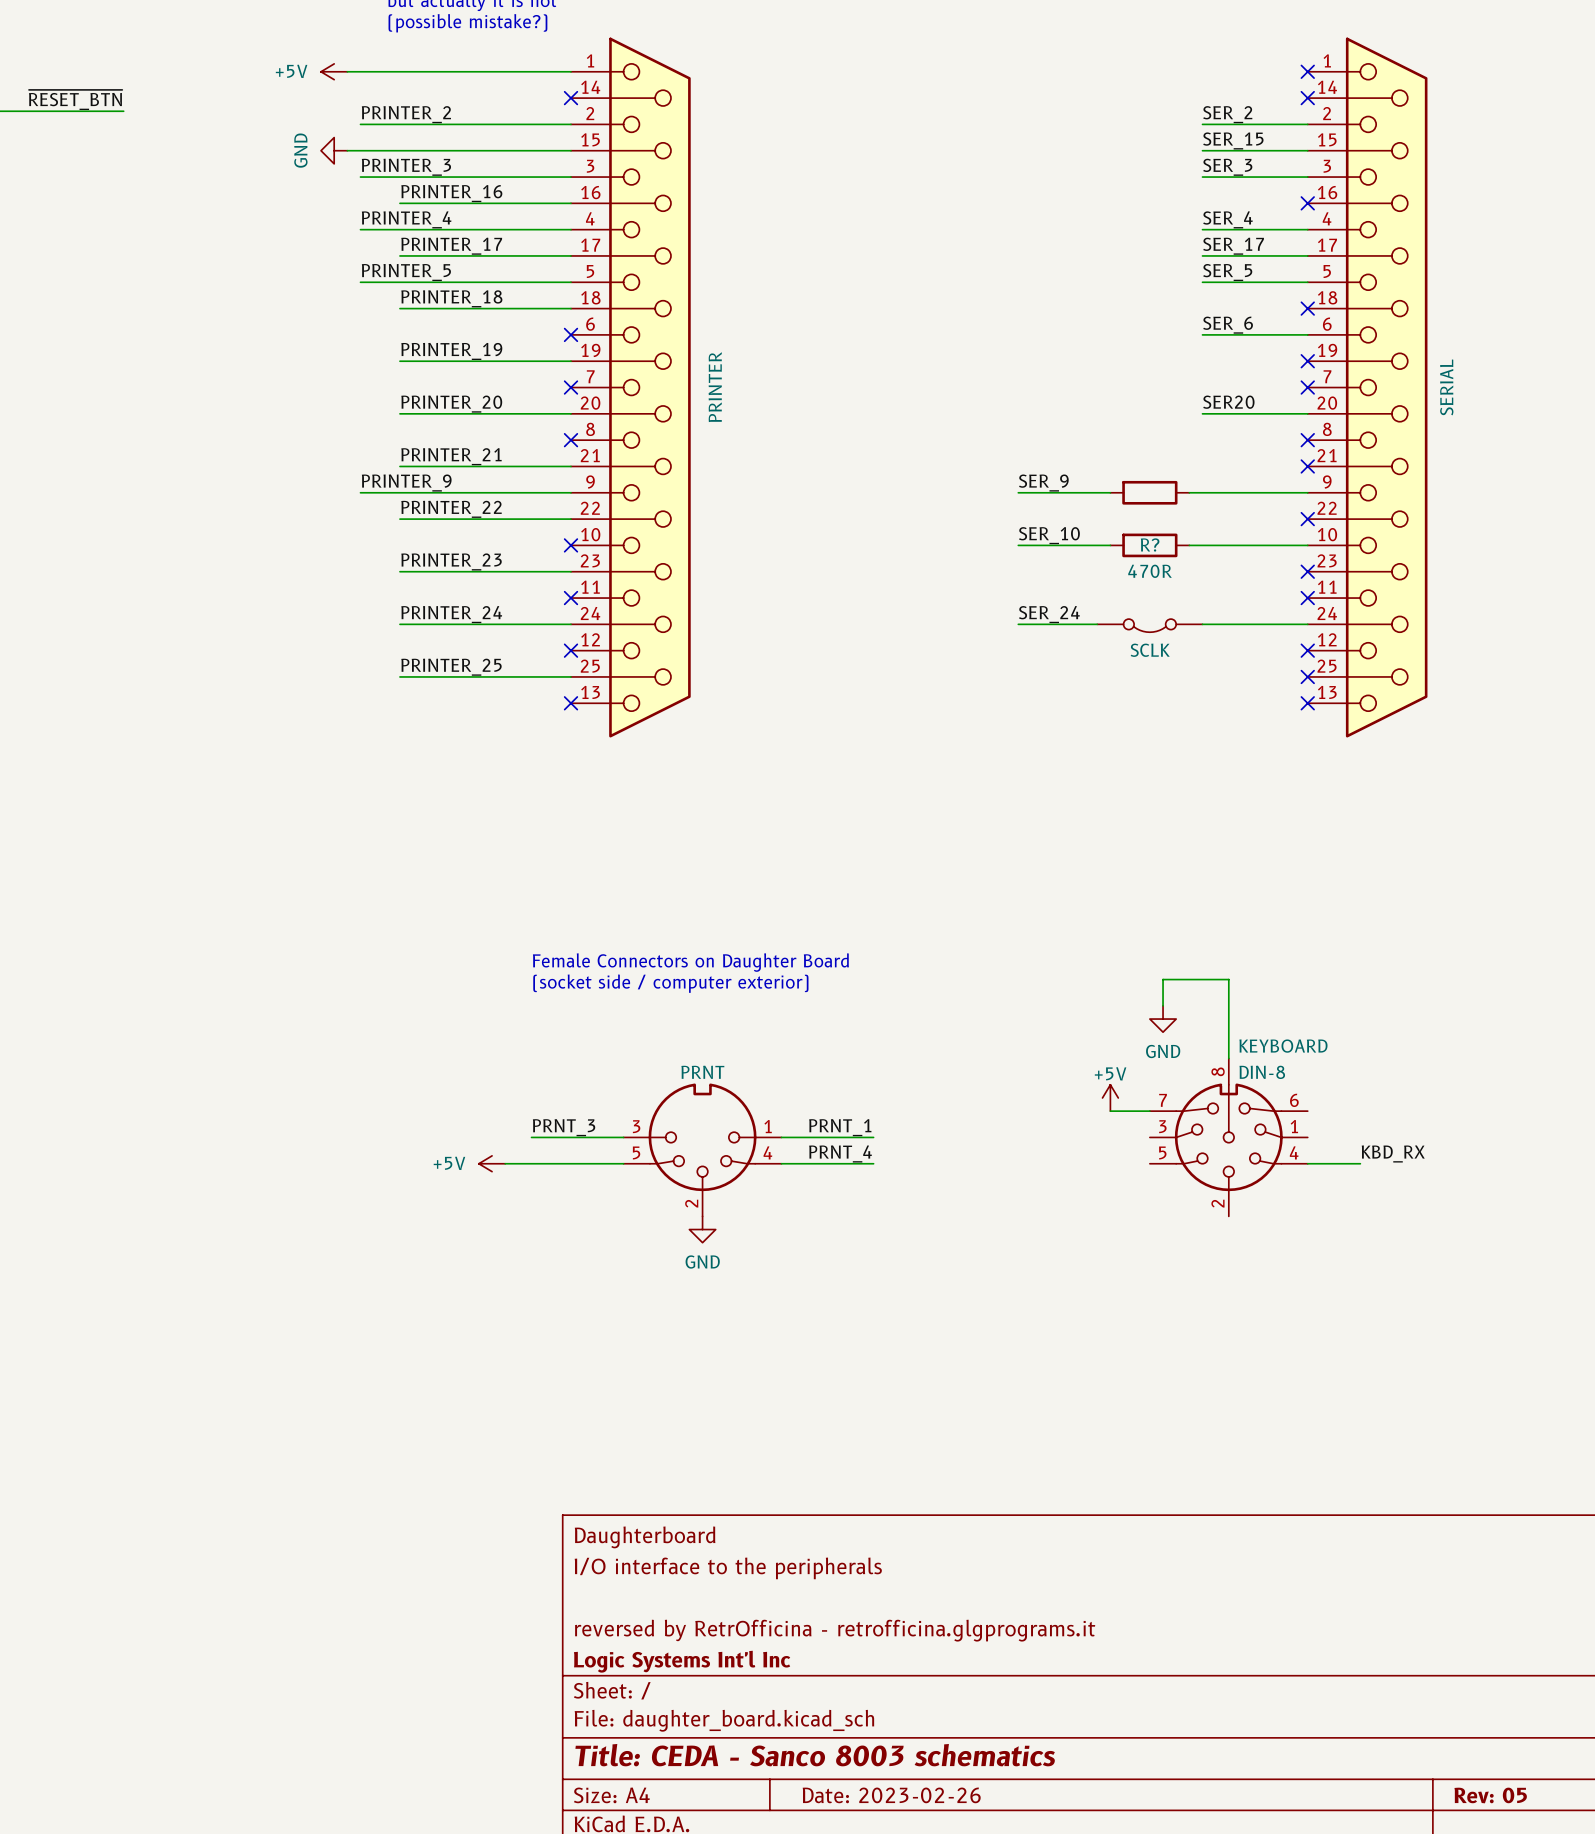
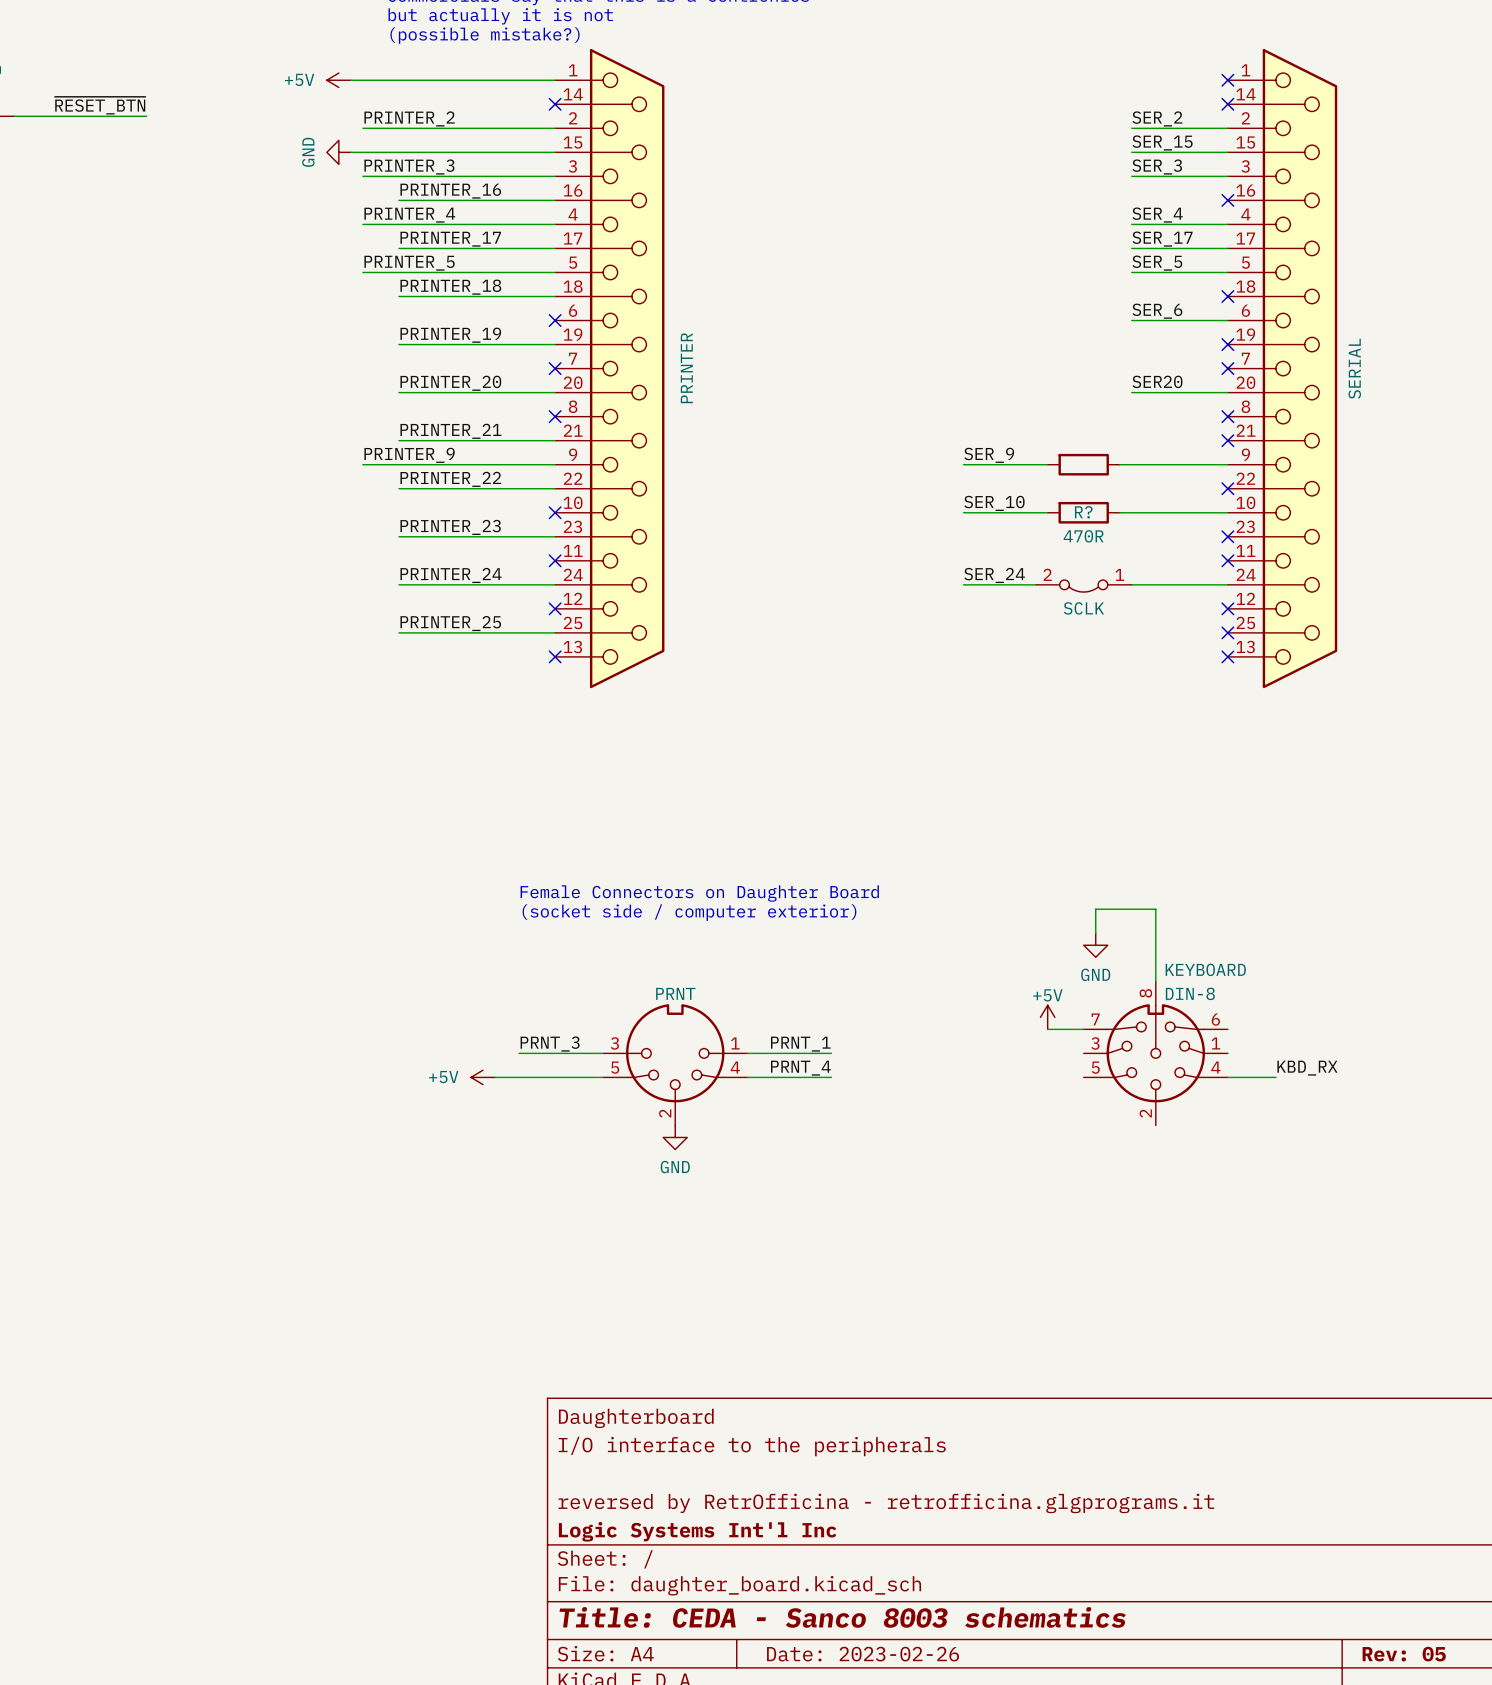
SCLK pin number: none -> 2 (1047, 574)
SCLK pin number: none -> 1 (1119, 574)

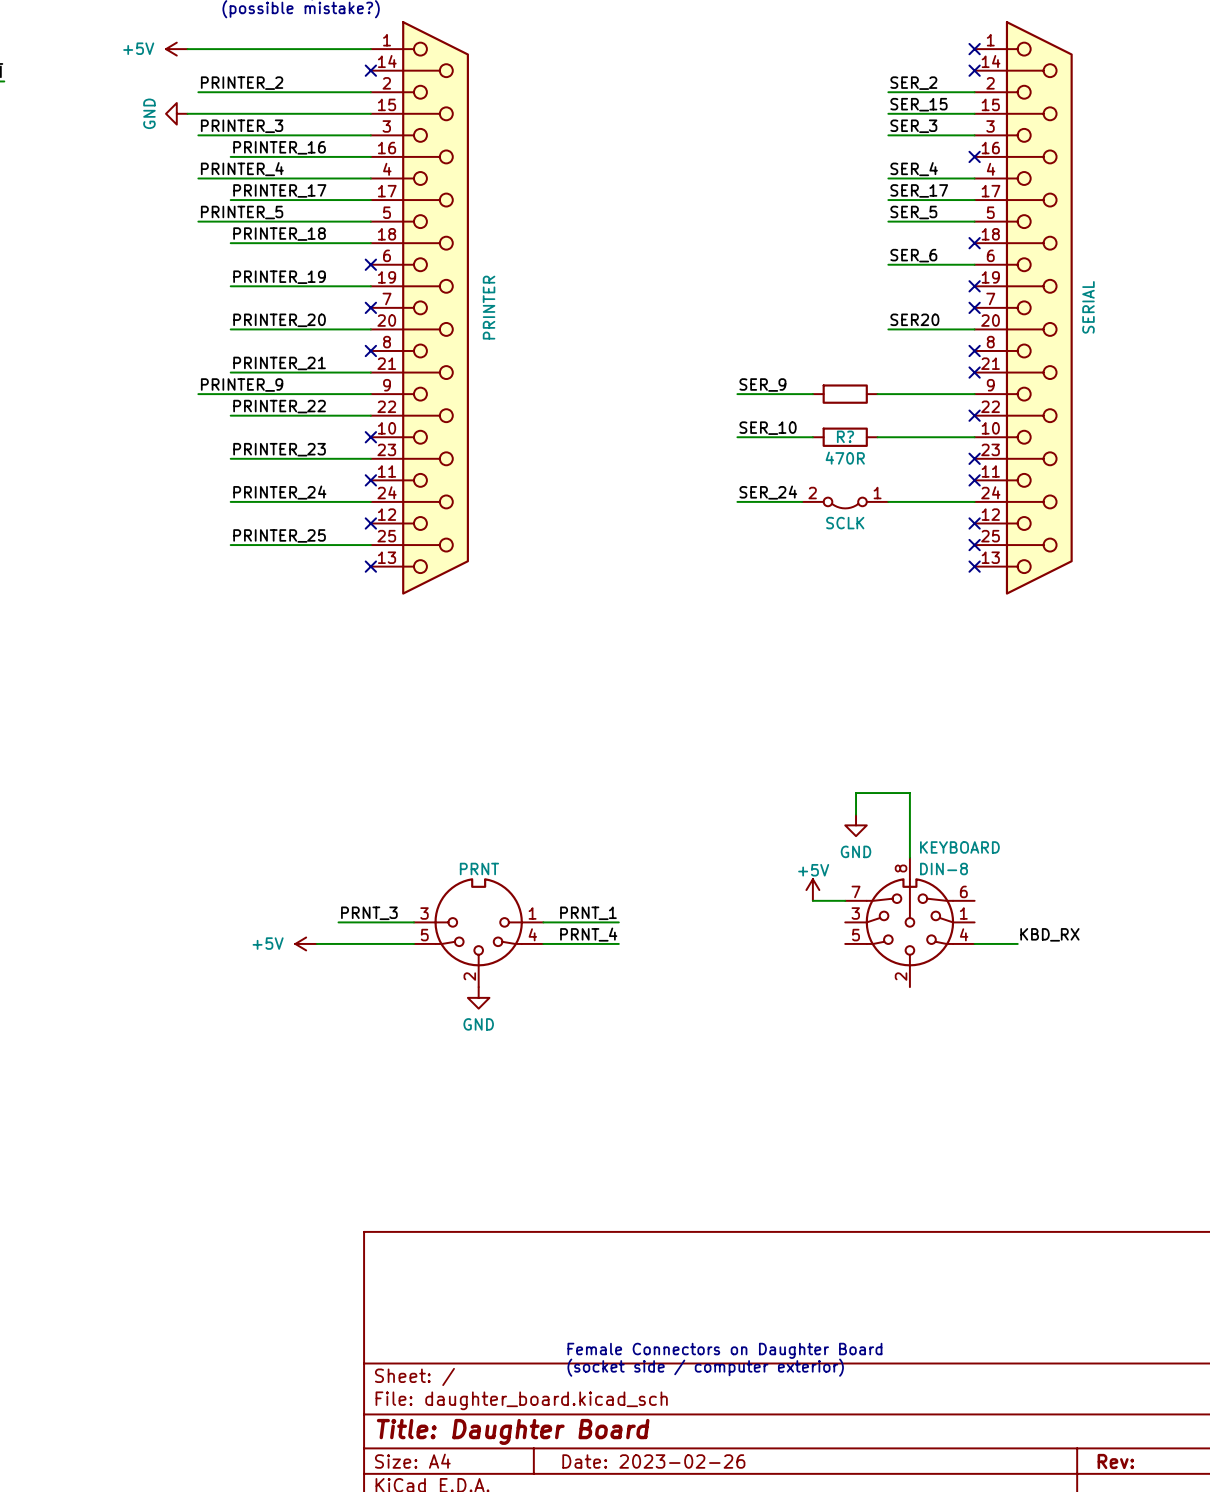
text: Female Connectors on Daughter Board (699, 893) -> none
text: (socket side / computer exterior) (689, 912) -> none
title block: Daughterboard (636, 1418) -> none
title block: I/O interface to the peripherals (752, 1446) -> none
title block: reversed by RetrOfficina - retrofficina.glgprograms.it (886, 1503) -> none
text: none -> Female Connectors on Daughter Board (724, 1350)
title block: Logic Systems Int'l Inc (697, 1531) -> none
text: none -> (socket side / computer exterior) (705, 1367)
title block: Title: CEDA - Sanco 8003 schematics (842, 1617) -> Title: Daughter Board (513, 1431)
title block: Rev: 05 (1404, 1654) -> Rev: (1115, 1461)

